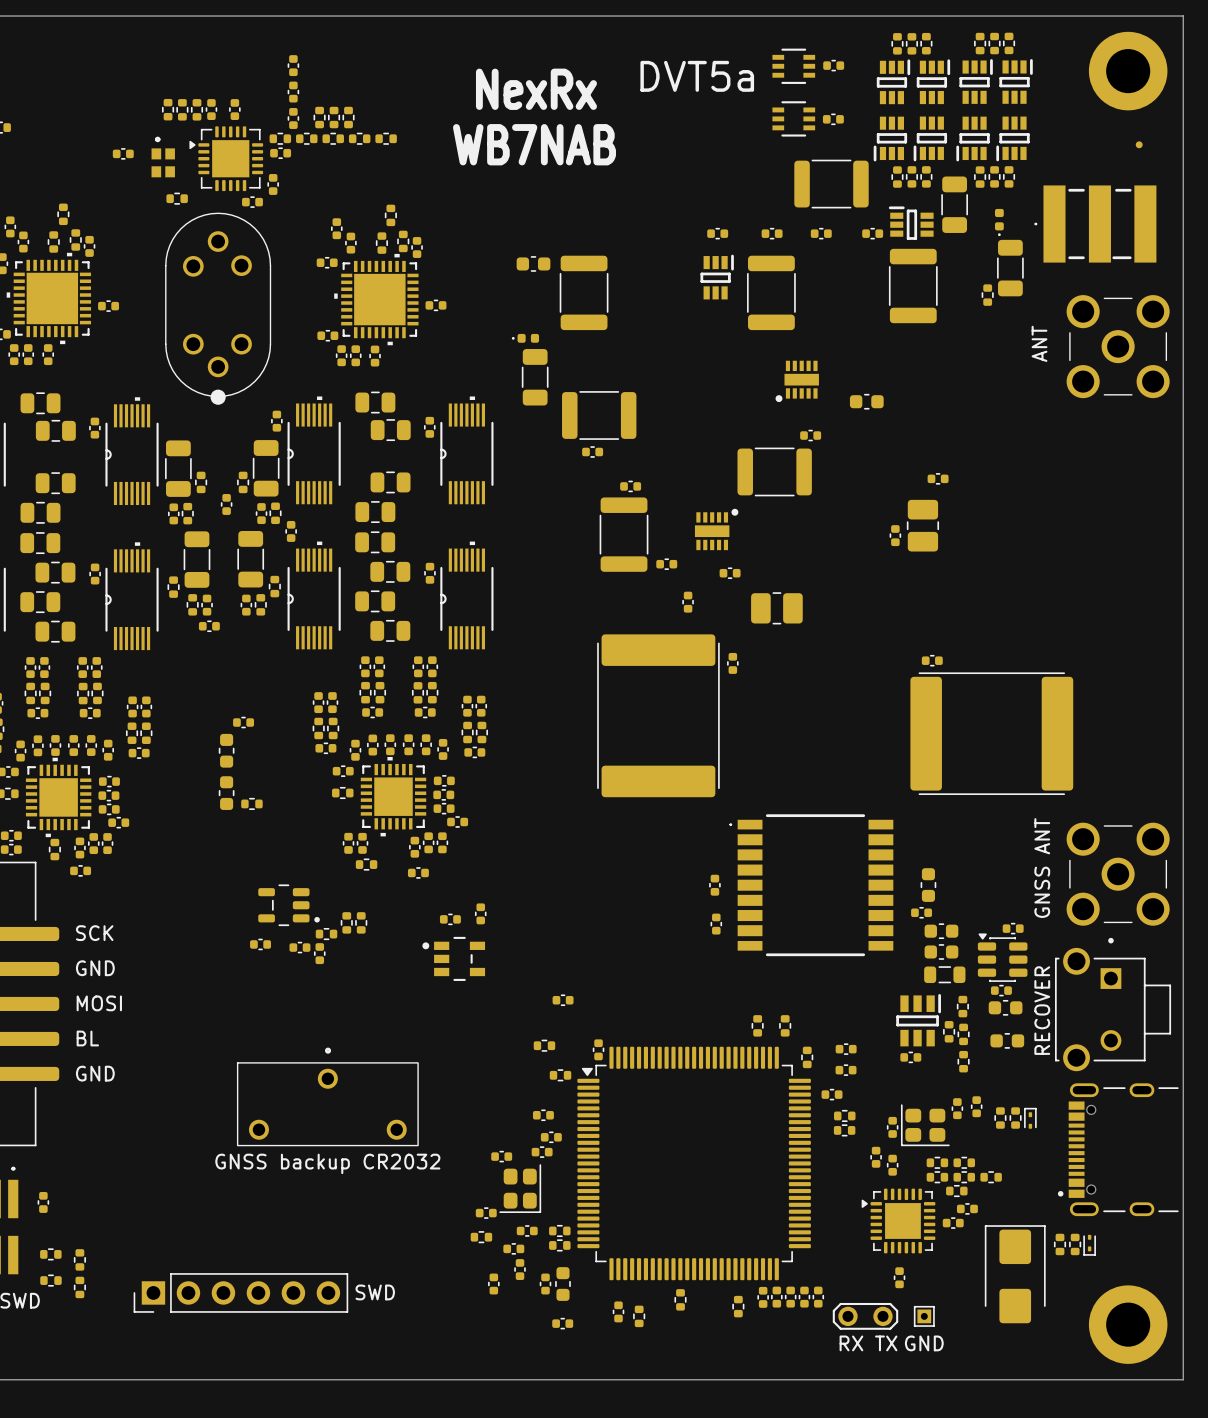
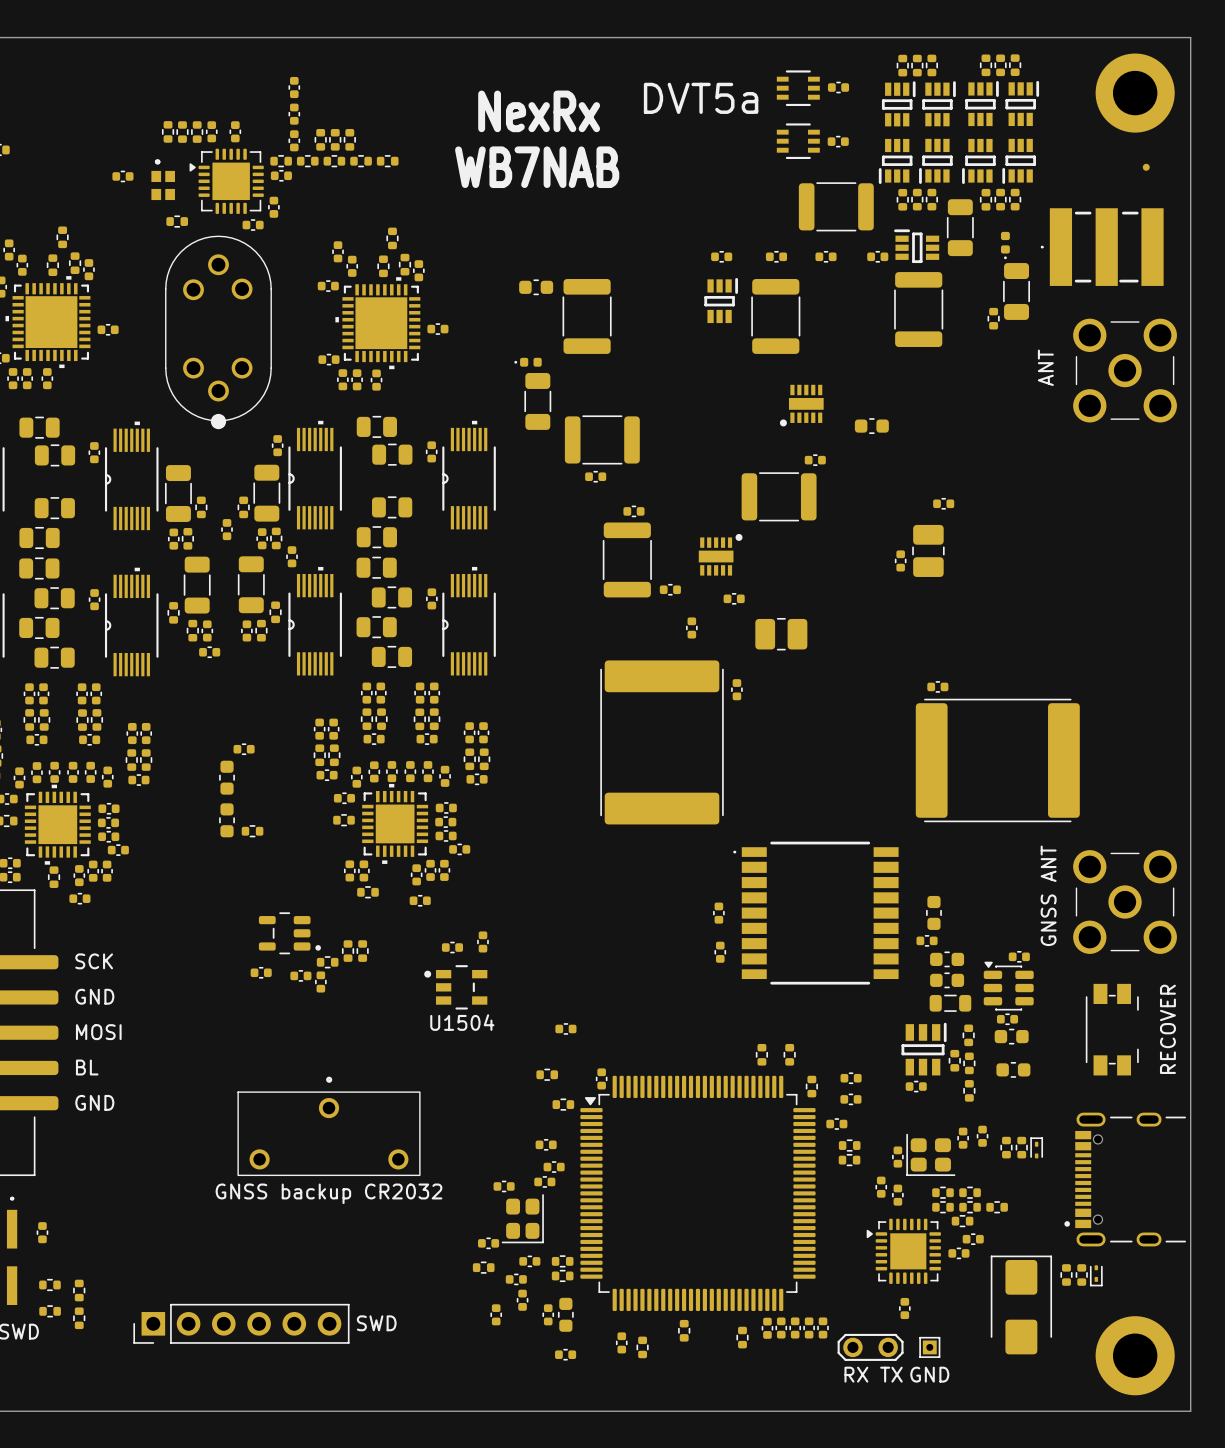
part footprint: [1054, 937, 1172, 1072] -> [1085, 983, 1139, 1076]
U1504 name: none -> U1504 (462, 1022)
part text position: RECOVER (1042, 1010) -> RECOVER (1167, 1029)

